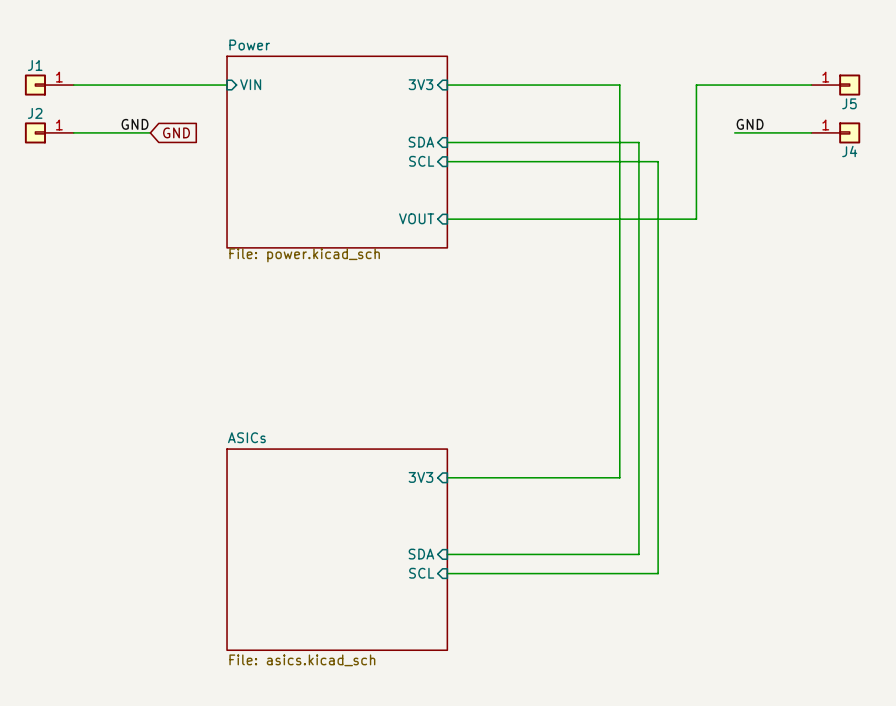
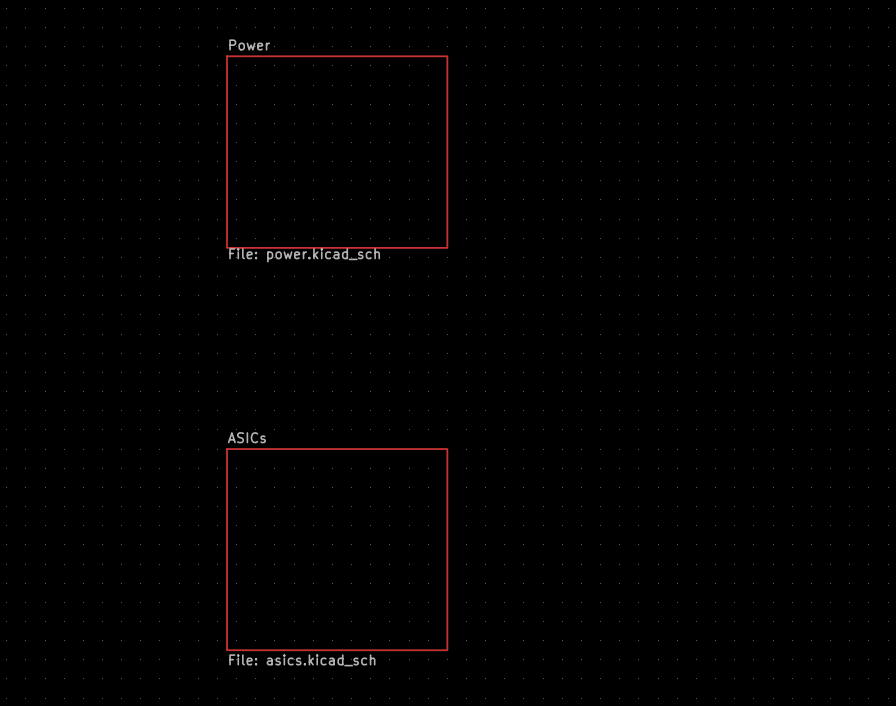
sheet pin: VIN (250, 84) -> none
sheet pin: 3V3 (420, 84) -> none
J1: (49, 85) -> none
wire: (73, 85) (227, 85) -> none
wire: (447, 85) (619, 85) (619, 477) (447, 477) -> none
wire: (811, 85) (696, 85) (696, 219) (447, 219) -> none
J5: (835, 85) -> none
label: GND (135, 124) -> none
label: GND (750, 124) -> none
J2: (49, 132) -> none
wire: (73, 132) (150, 132) -> none
global label: GND (176, 132) -> none
wire: (734, 132) (811, 132) -> none
J4: (835, 132) -> none
sheet pin: SDA (421, 142) -> none
wire: (447, 142) (638, 142) (638, 554) (447, 554) -> none
sheet pin: SCL (421, 161) -> none
wire: (447, 161) (658, 161) (658, 573) (447, 573) -> none
sheet pin: VOUT (416, 218) -> none
sheet pin: 3V3 (420, 477) -> none
sheet pin: SDA (421, 554) -> none
sheet pin: SCL (421, 573) -> none

